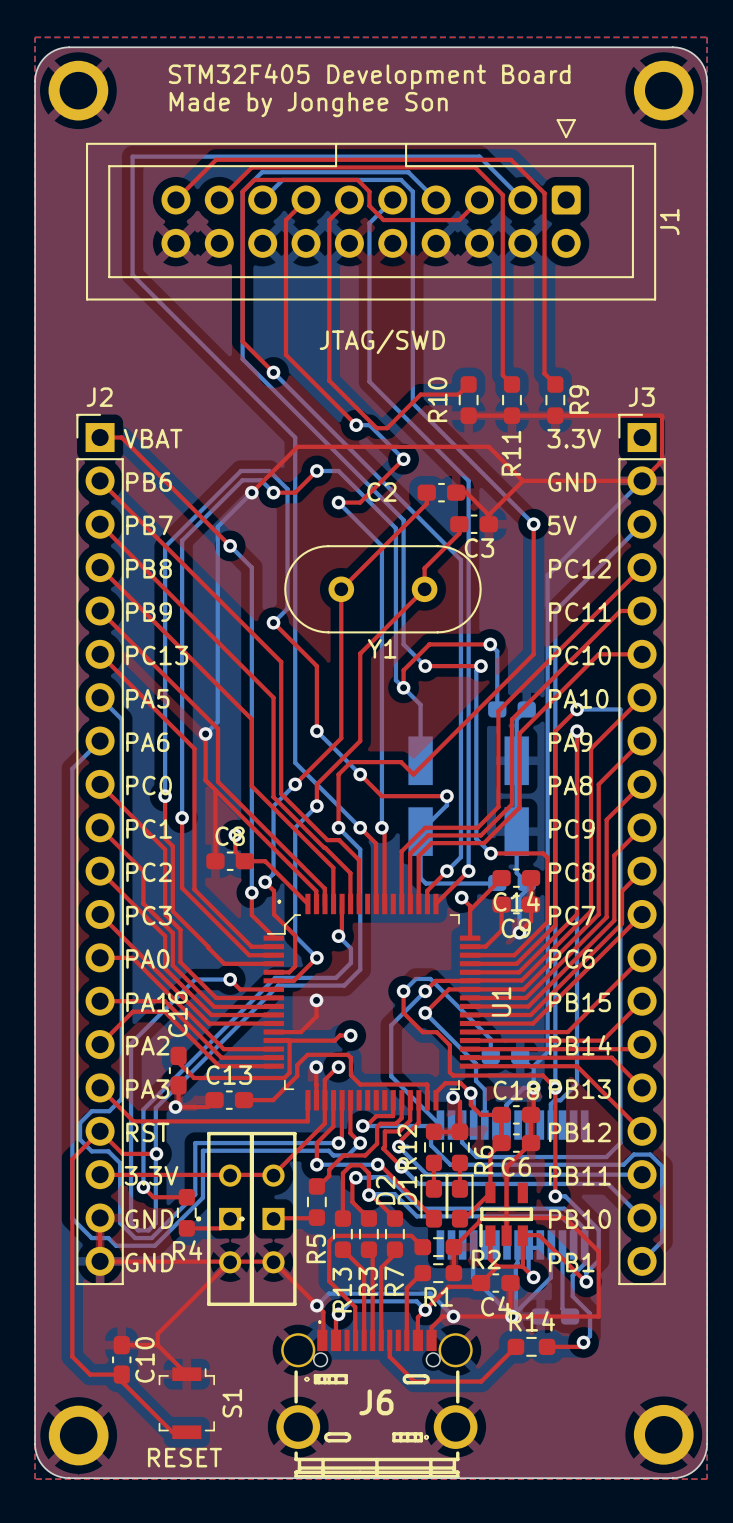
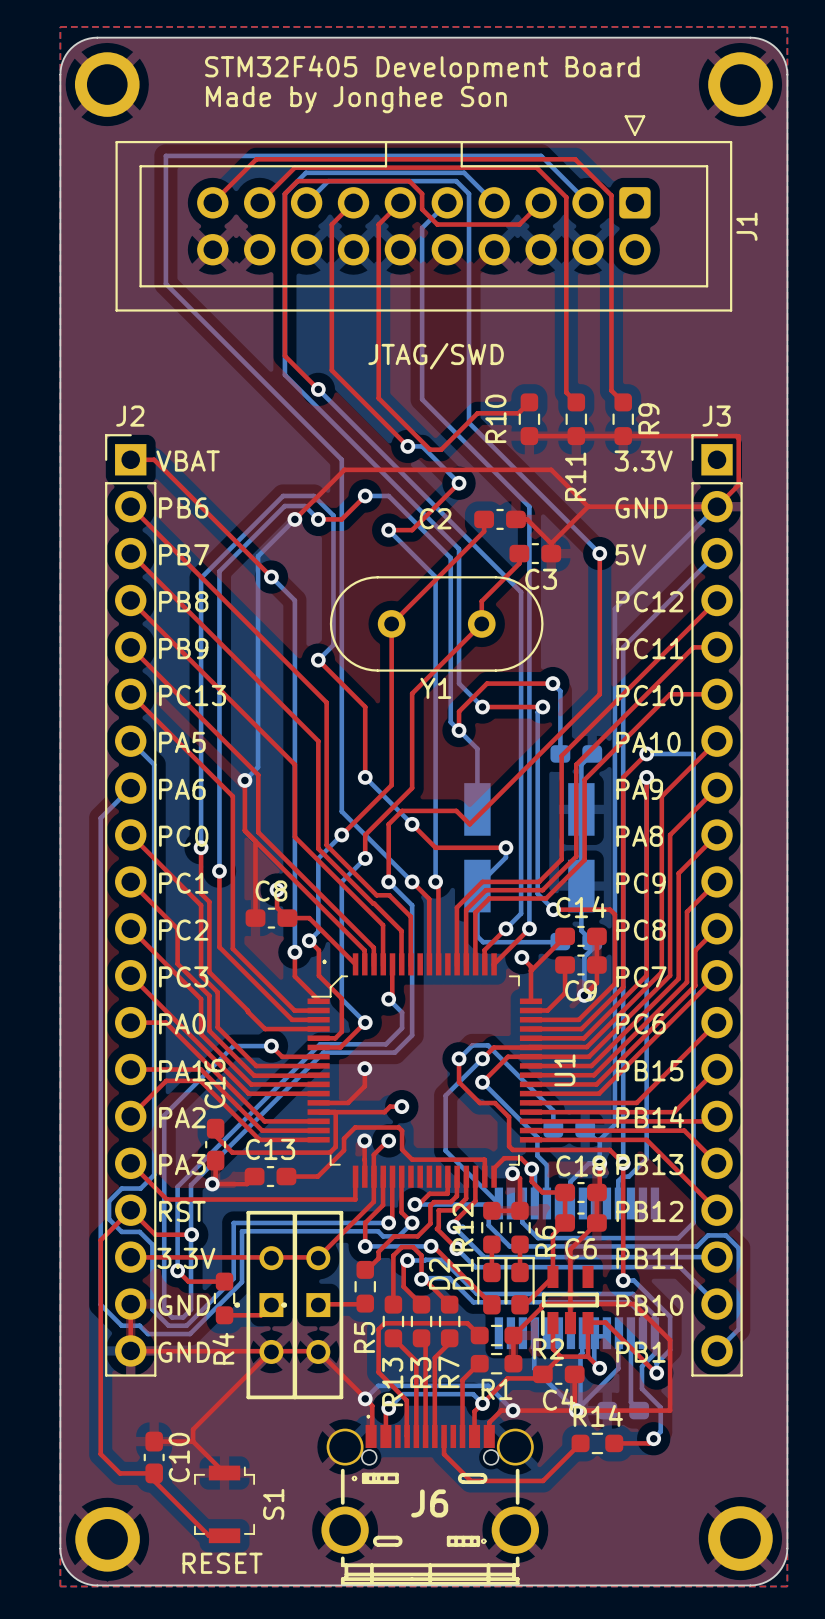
C14 name position: C14 (516, 901) -> C14 (581, 907)
R4 name rotation: 0° (187, 1250) -> 90° counterclockwise (223, 1348)

